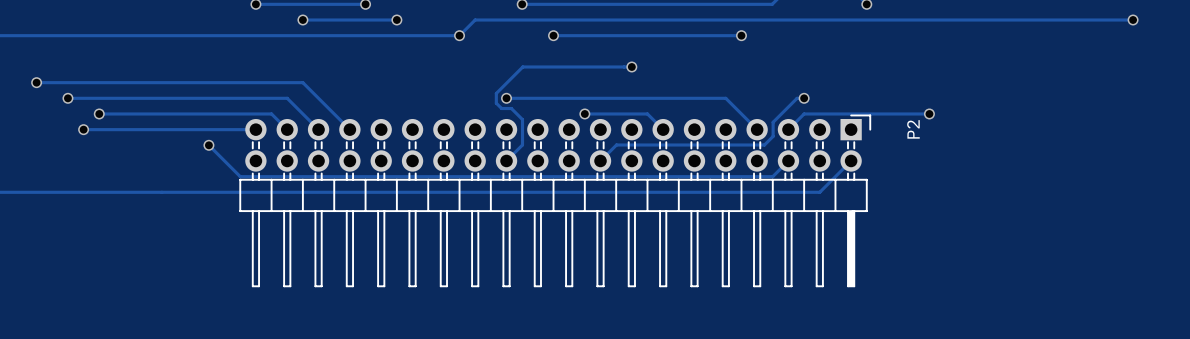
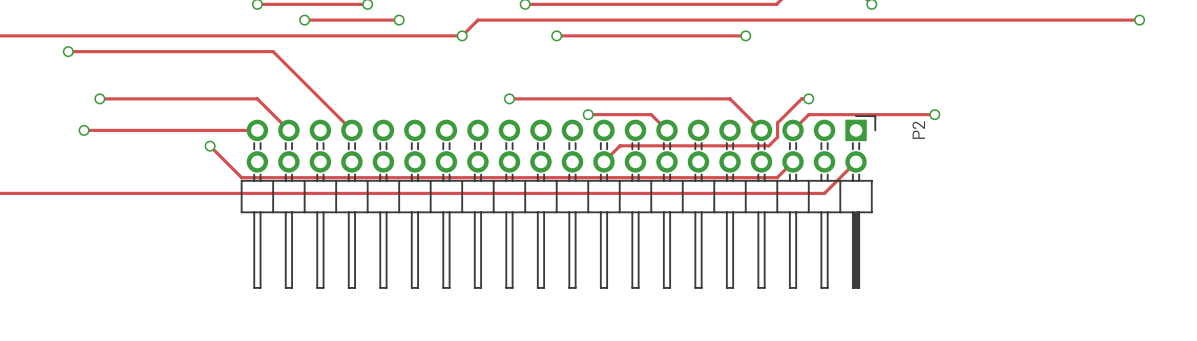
via: none -> (68, 51)
track: (631, 66) (522, 66) (496, 93) (496, 103) (501, 108) (511, 108) (522, 119) (522, 144) (506, 160) -> none
via: (631, 66) -> none
track: (36, 82) (302, 82) -> (68, 51) (273, 51) (304, 83)
via: (36, 82) -> none
track: (67, 98) (99, 98) -> none
via: (67, 98) -> none
via: none -> (99, 98)
track: (255, 98) (287, 98) (318, 129) -> (257, 98) (273, 114)
track: (99, 113) (271, 113) -> none
via: (99, 113) -> none

